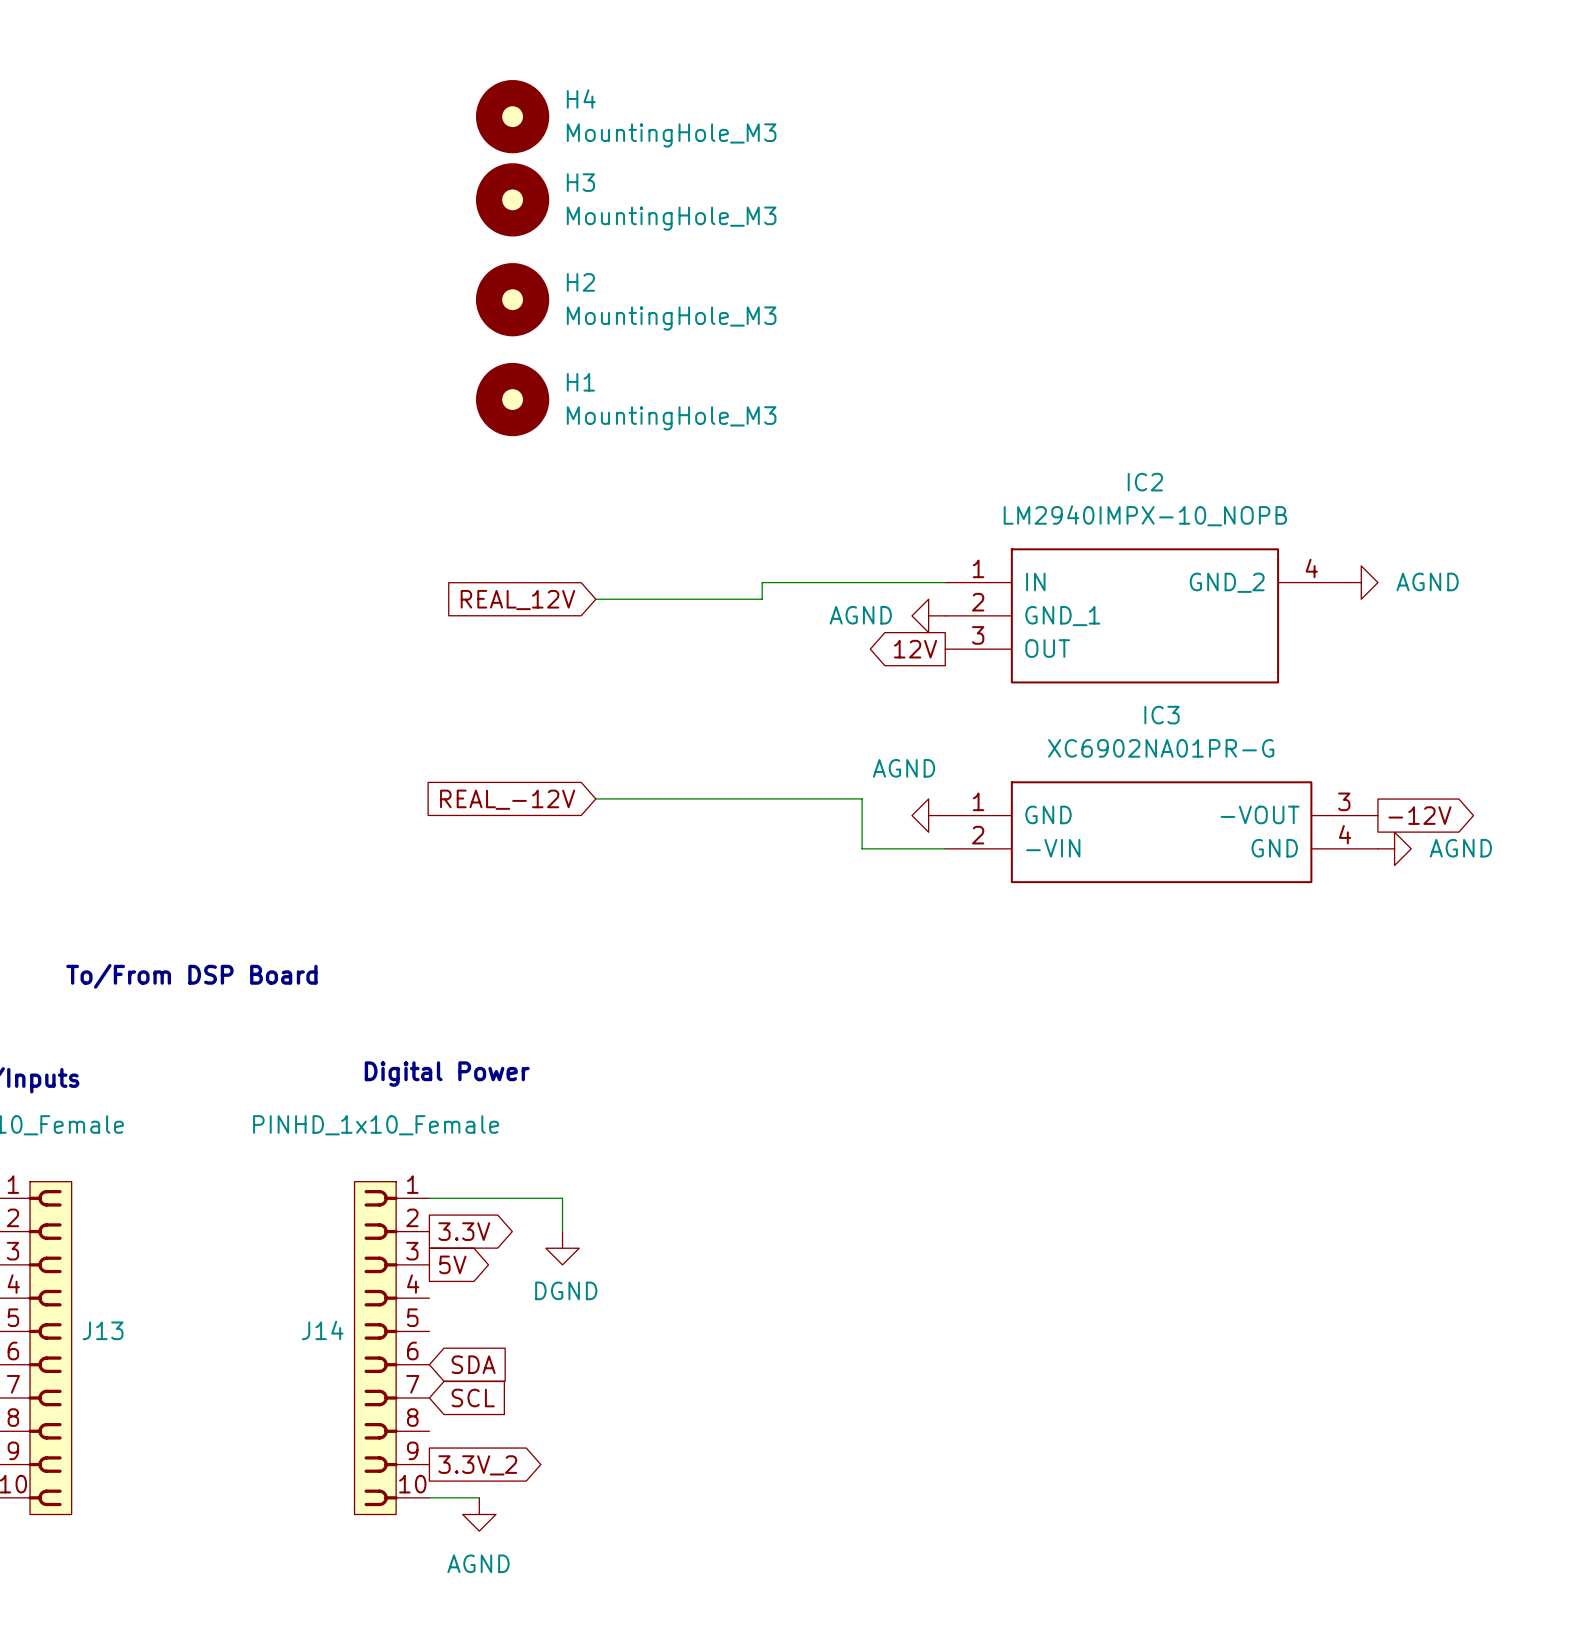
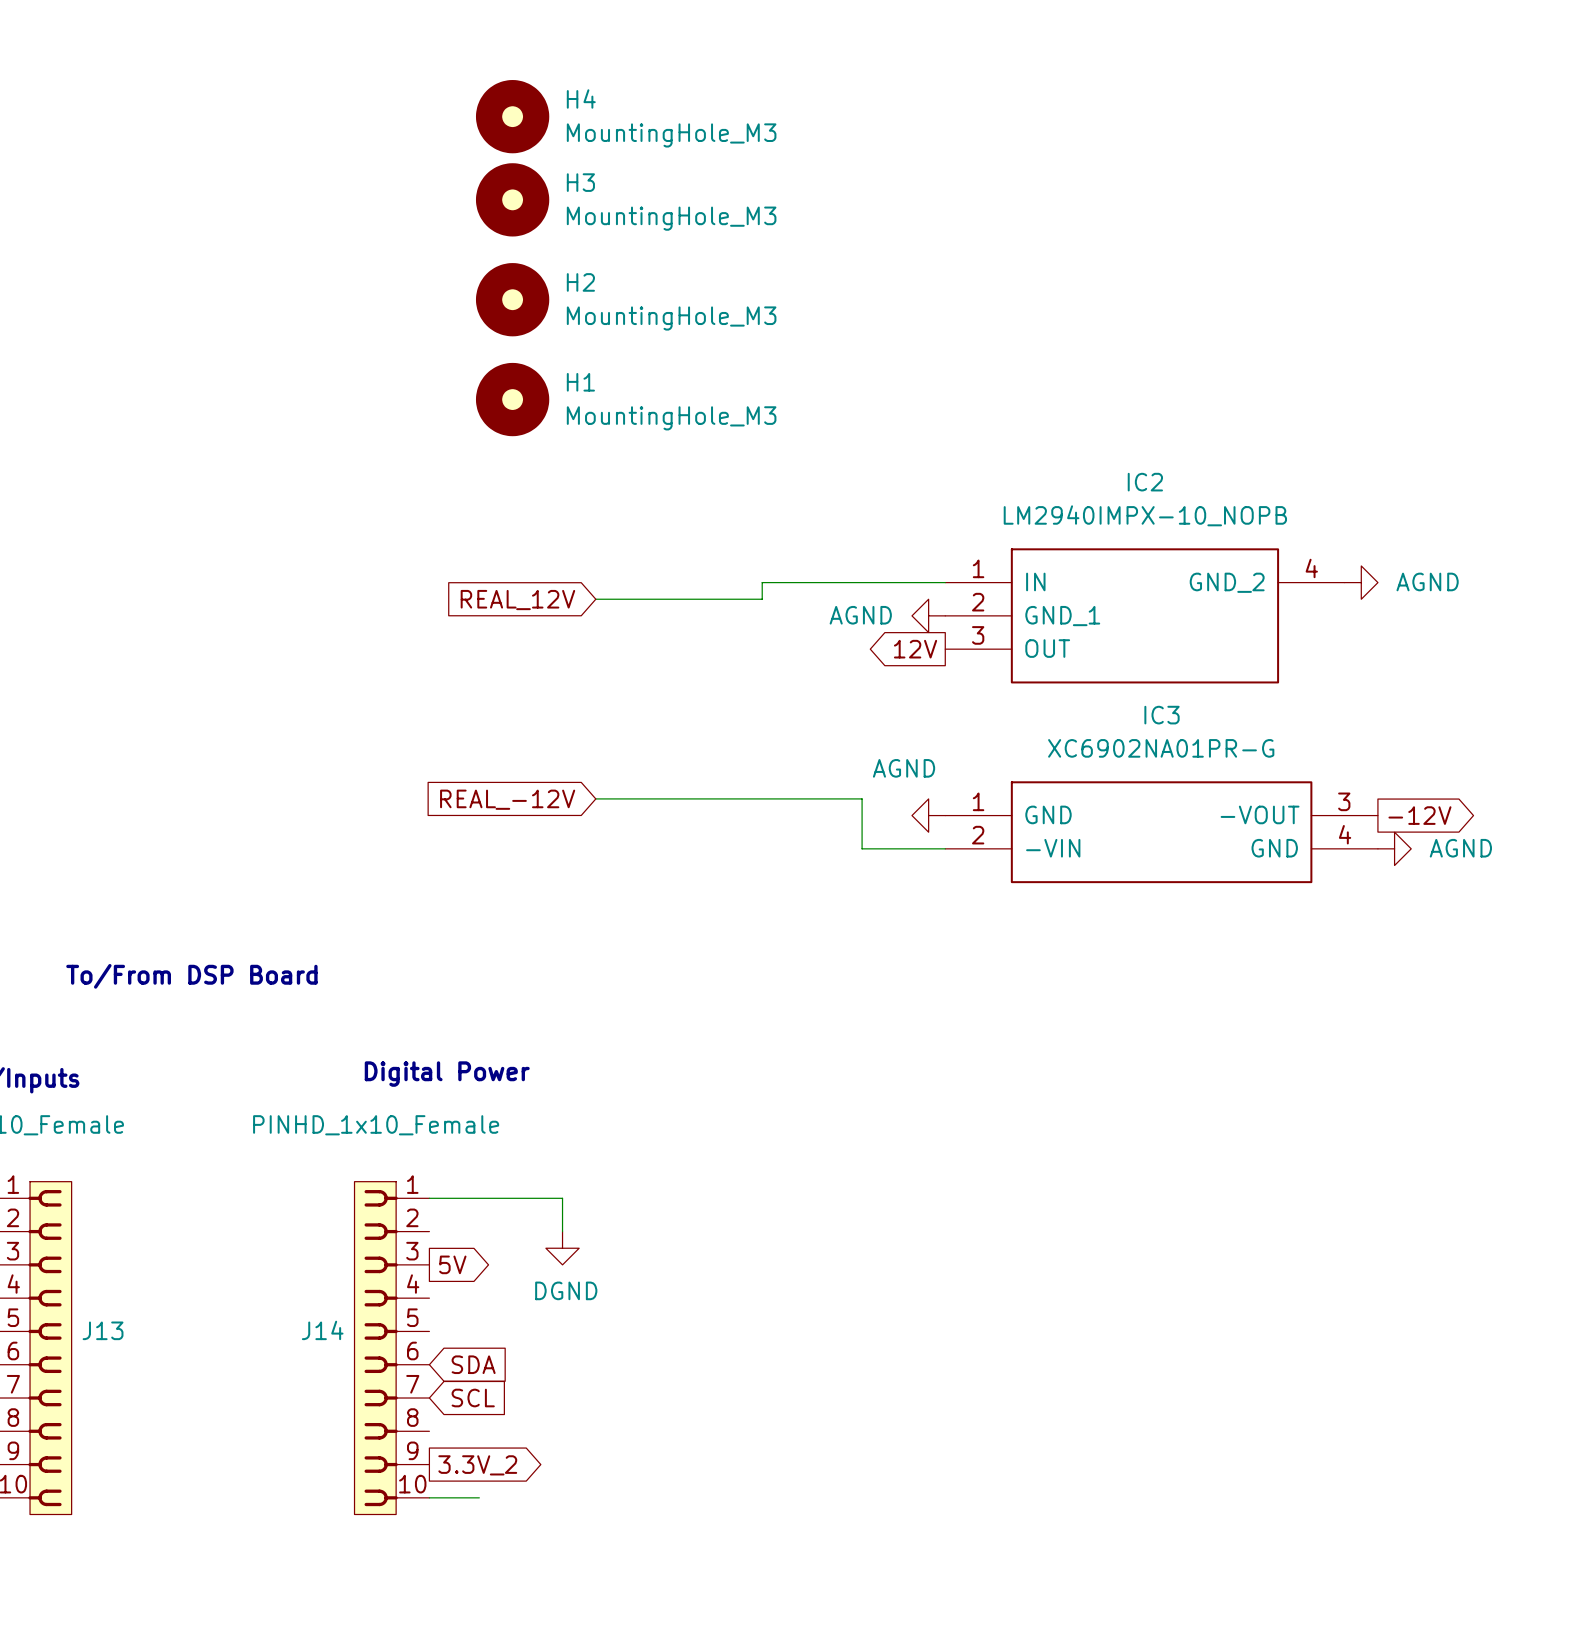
global label: 3.3V (464, 1231) -> none
power symbol: AGND (479, 1514) -> none

